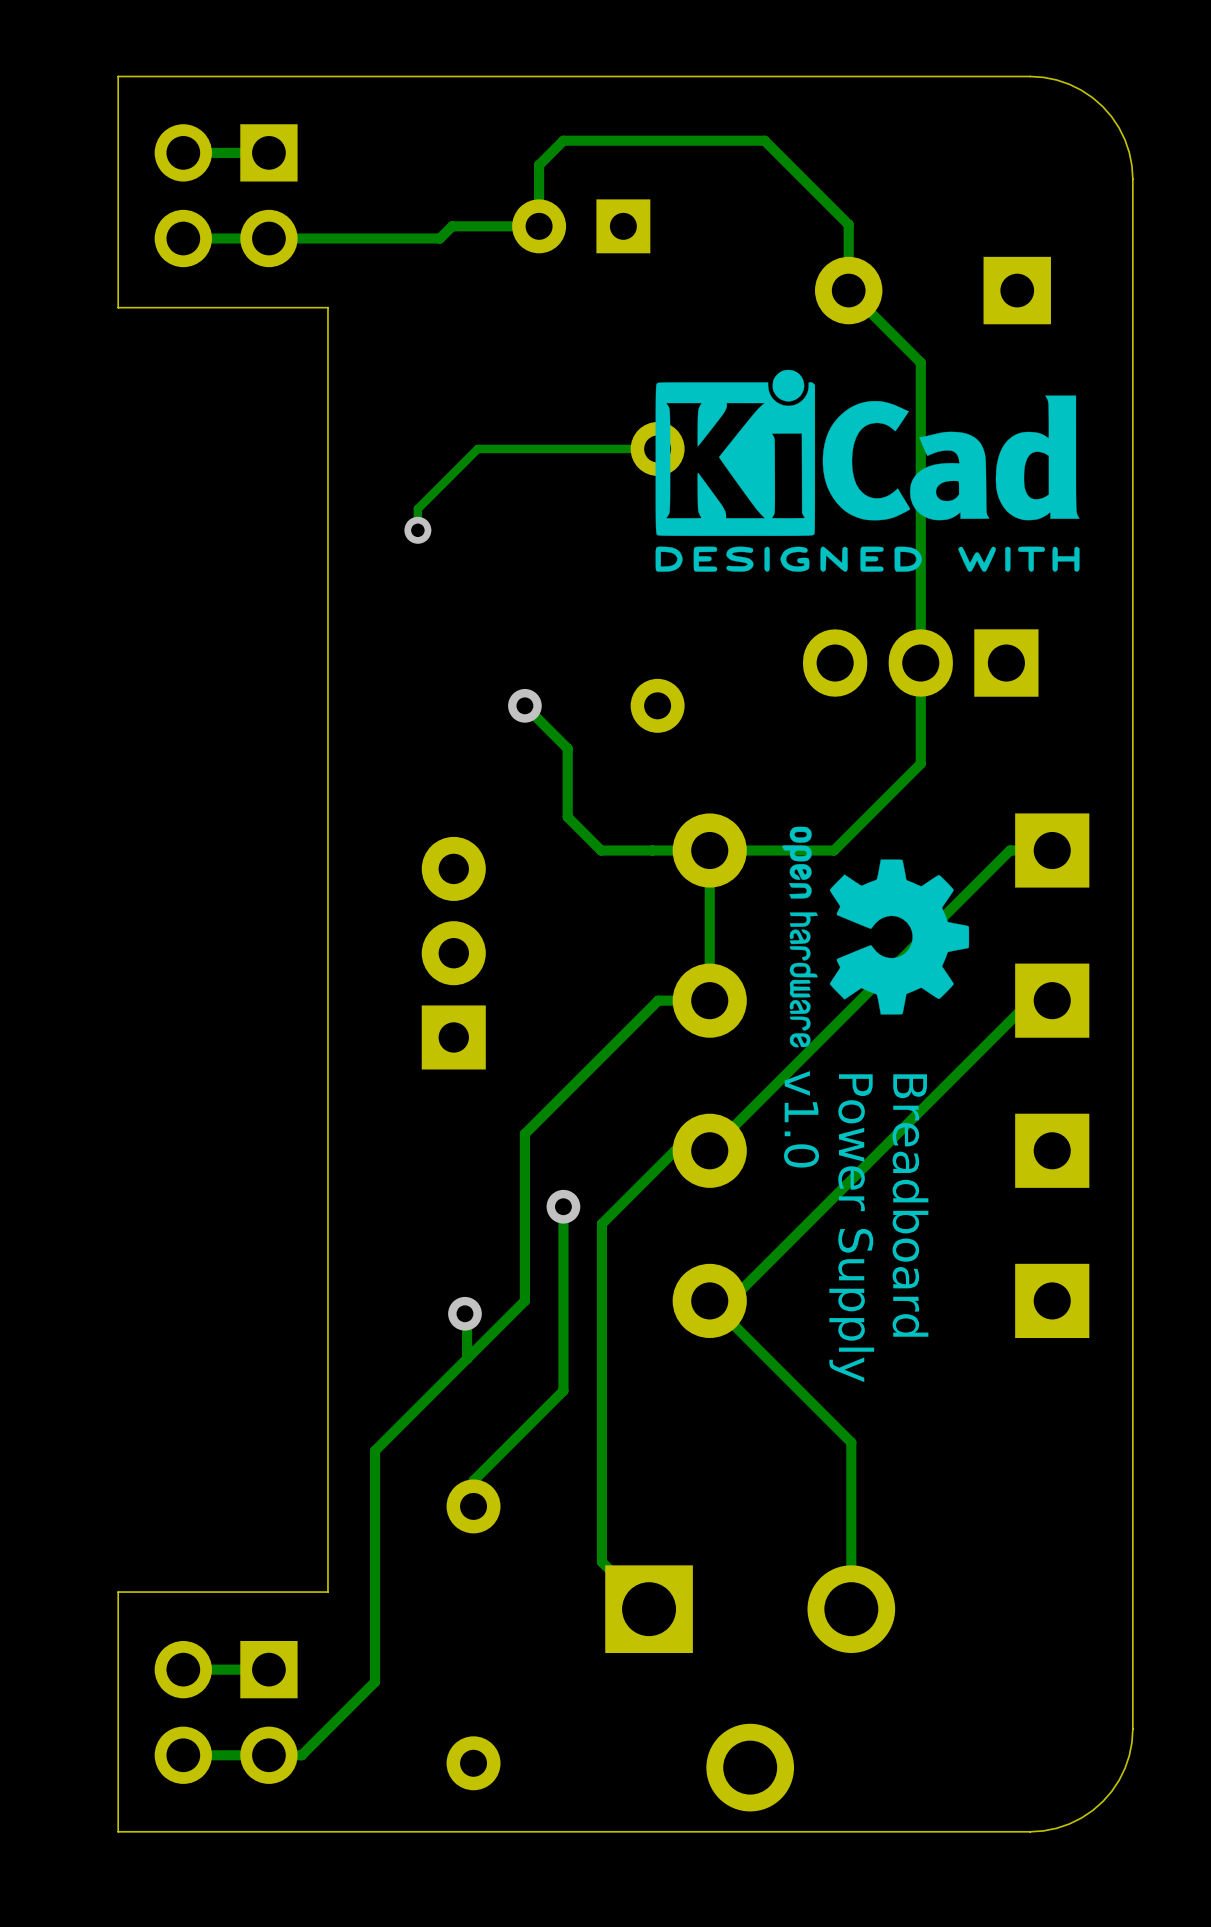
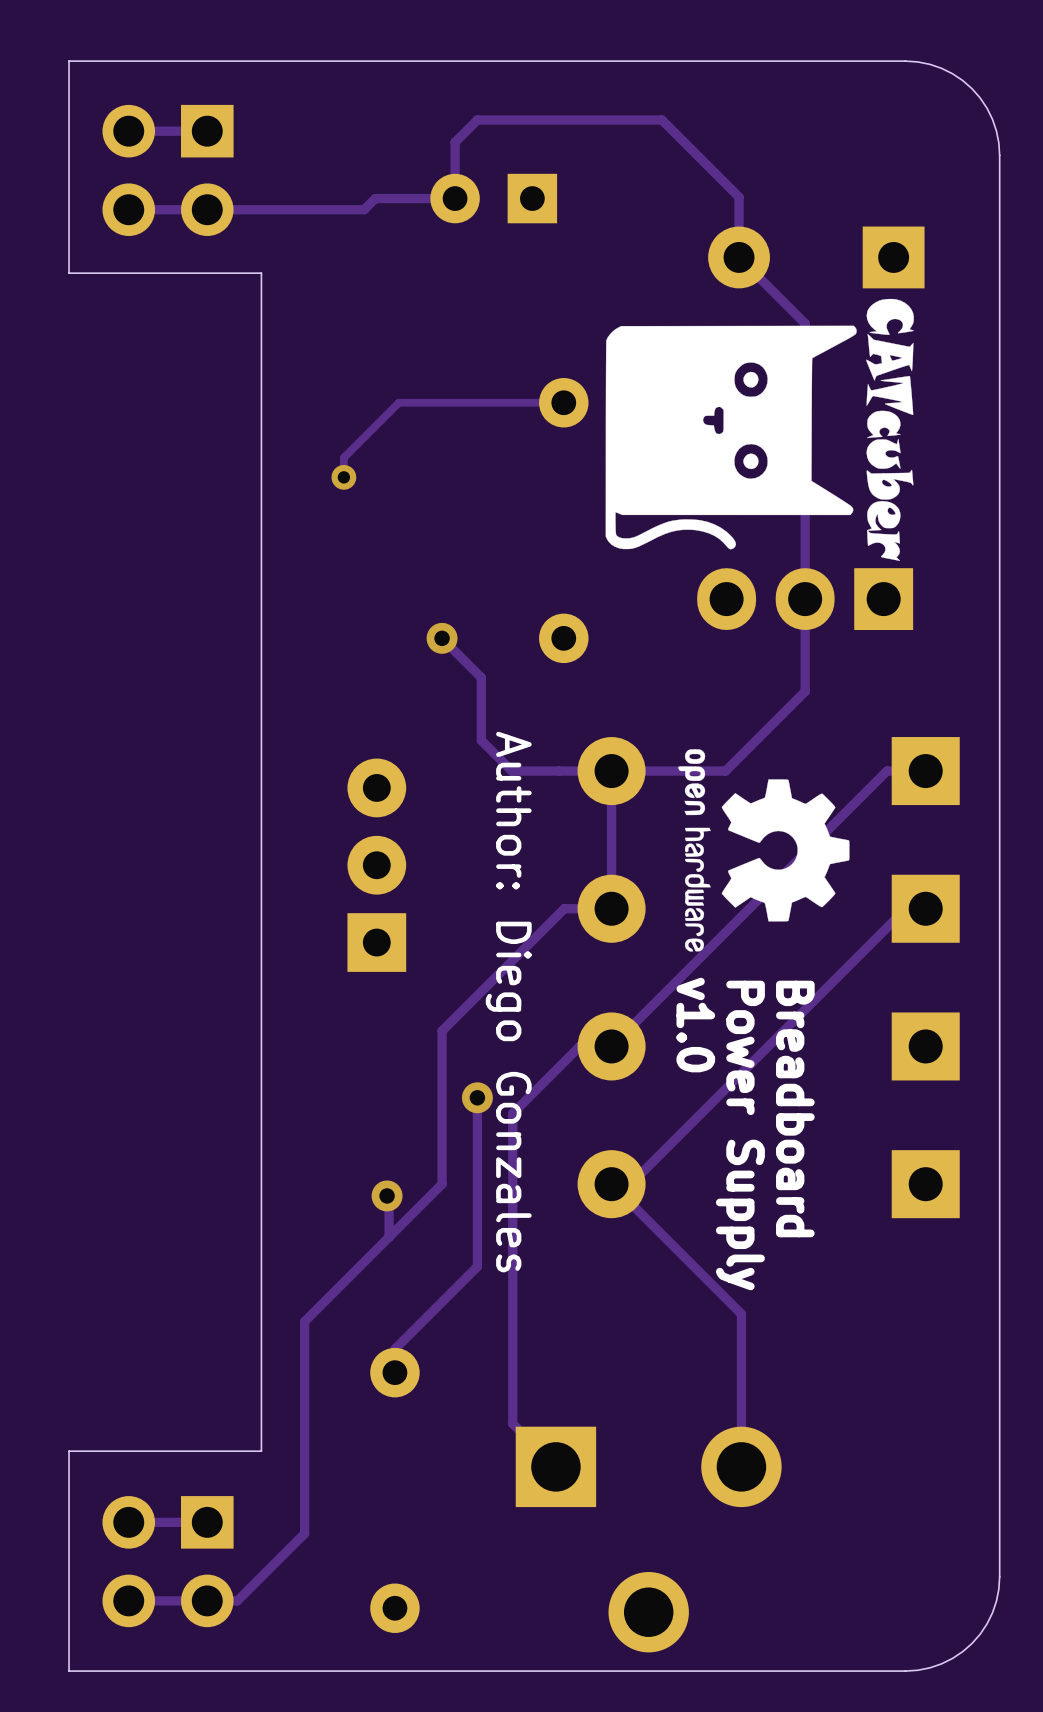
drawing shape: [655, 369, 1080, 572] -> [605, 298, 914, 561]
text: none -> Author: Diego Gonzales (508, 1002)

